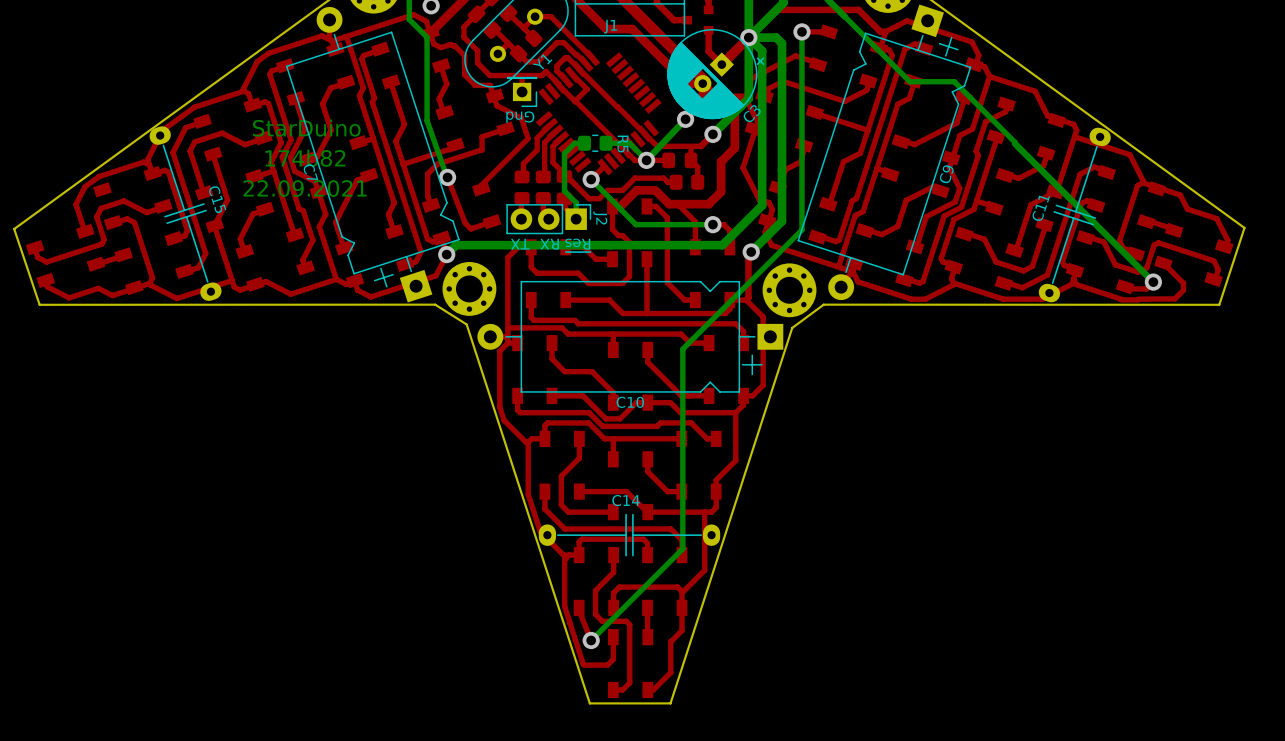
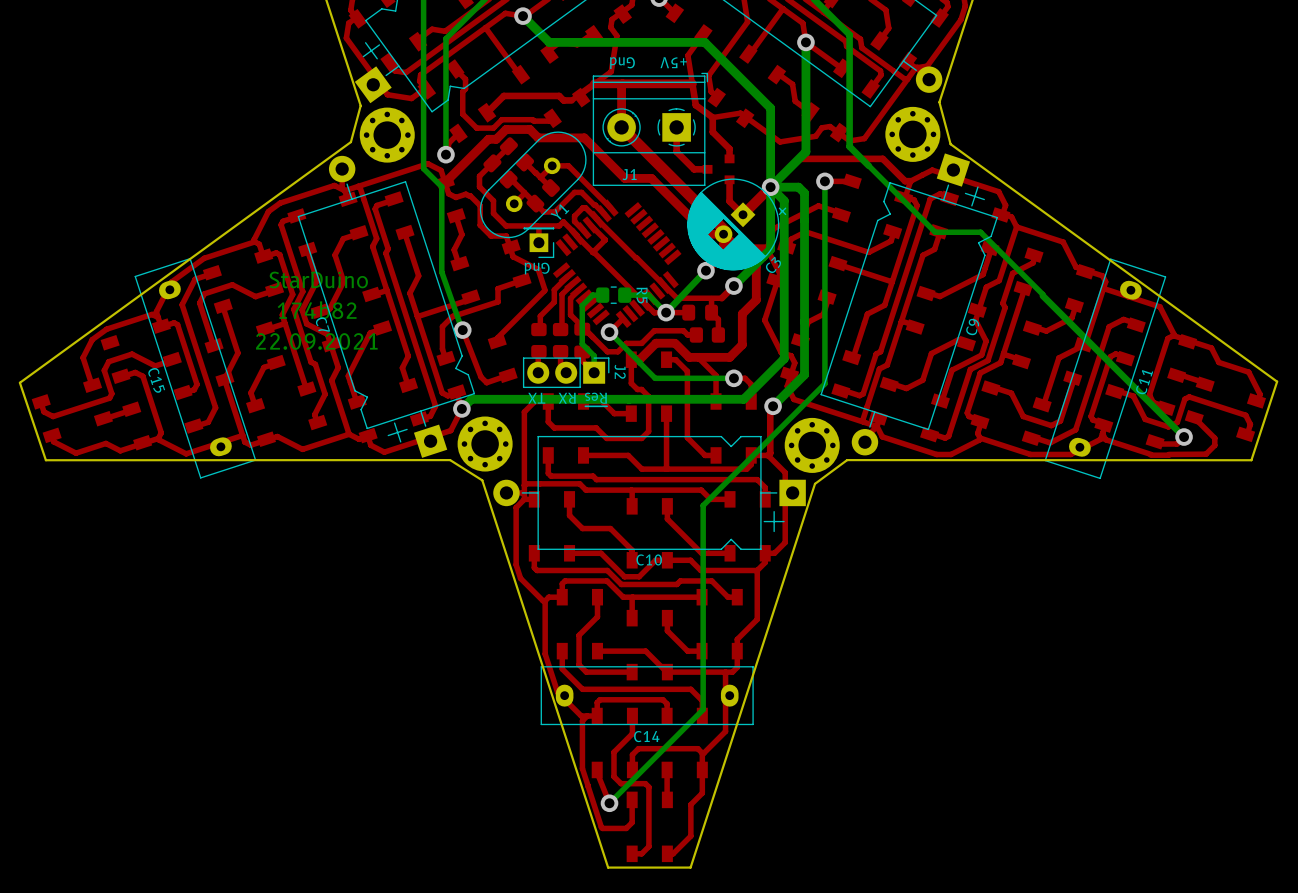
C15 footprint: [149, 126, 222, 301] -> [134, 258, 257, 479]
C11 footprint: [1038, 127, 1111, 303] -> [1044, 258, 1167, 480]
C15 name position: C15 (217, 199) -> C15 (156, 380)
C11 name position: C11 (1041, 208) -> C11 (1144, 382)
C14 name position: C14 (626, 500) -> C14 (646, 736)
C14 footprint: [538, 513, 721, 557] -> [540, 666, 754, 726]

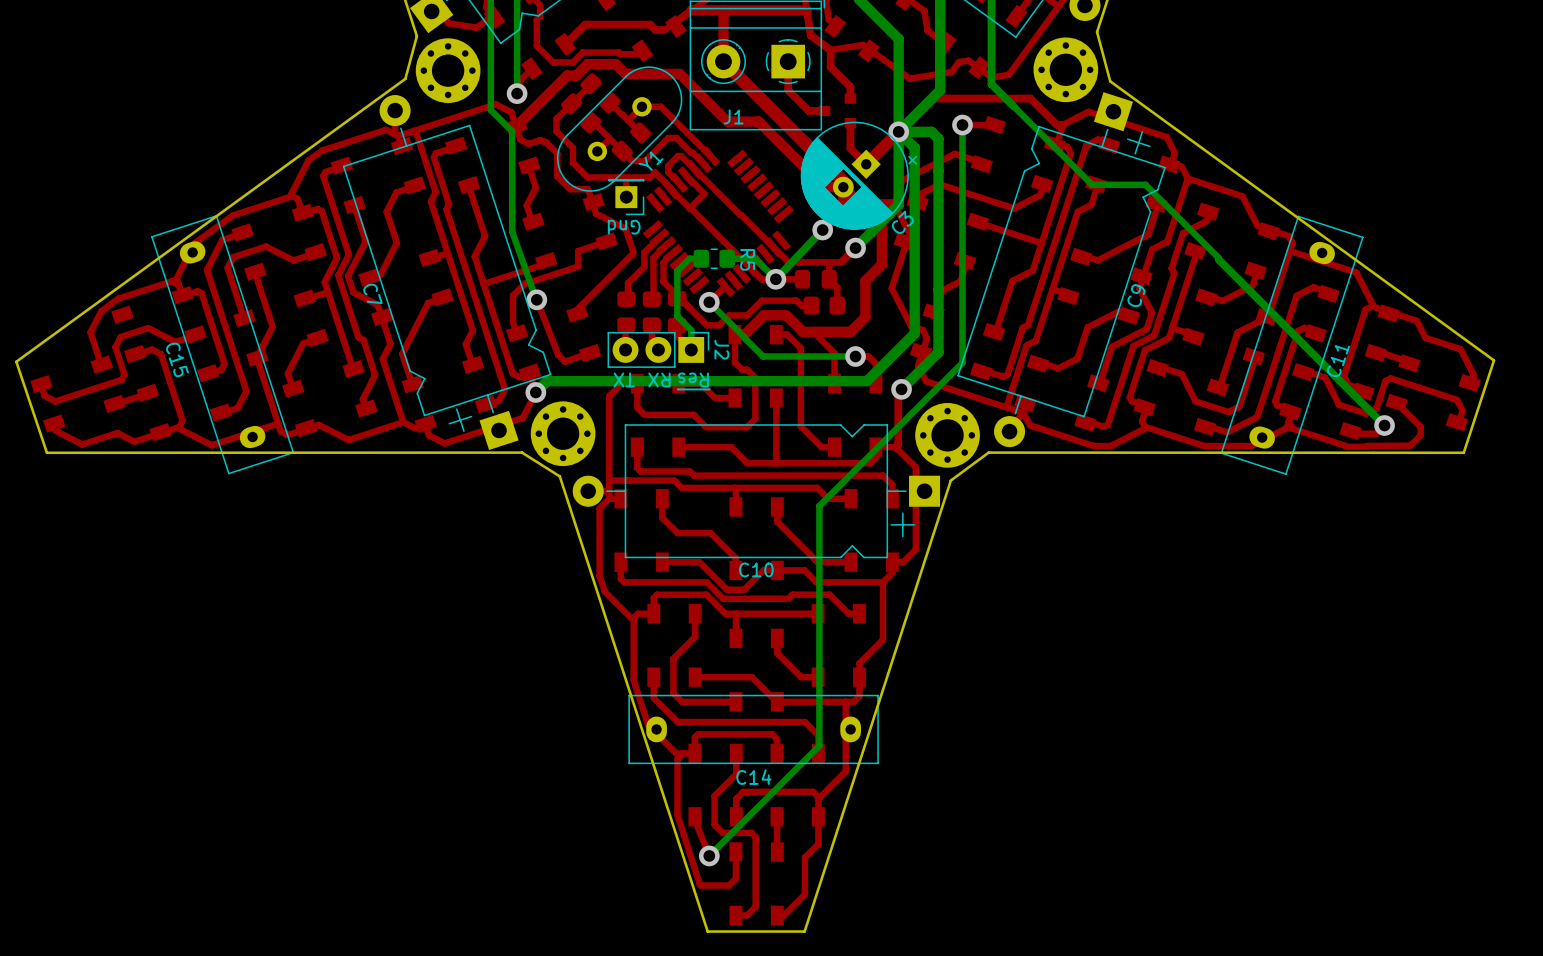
text: StarDuino (318, 279) -> none
text: 174b82 (317, 310) -> none
text: 22.09.2021 (316, 341) -> none

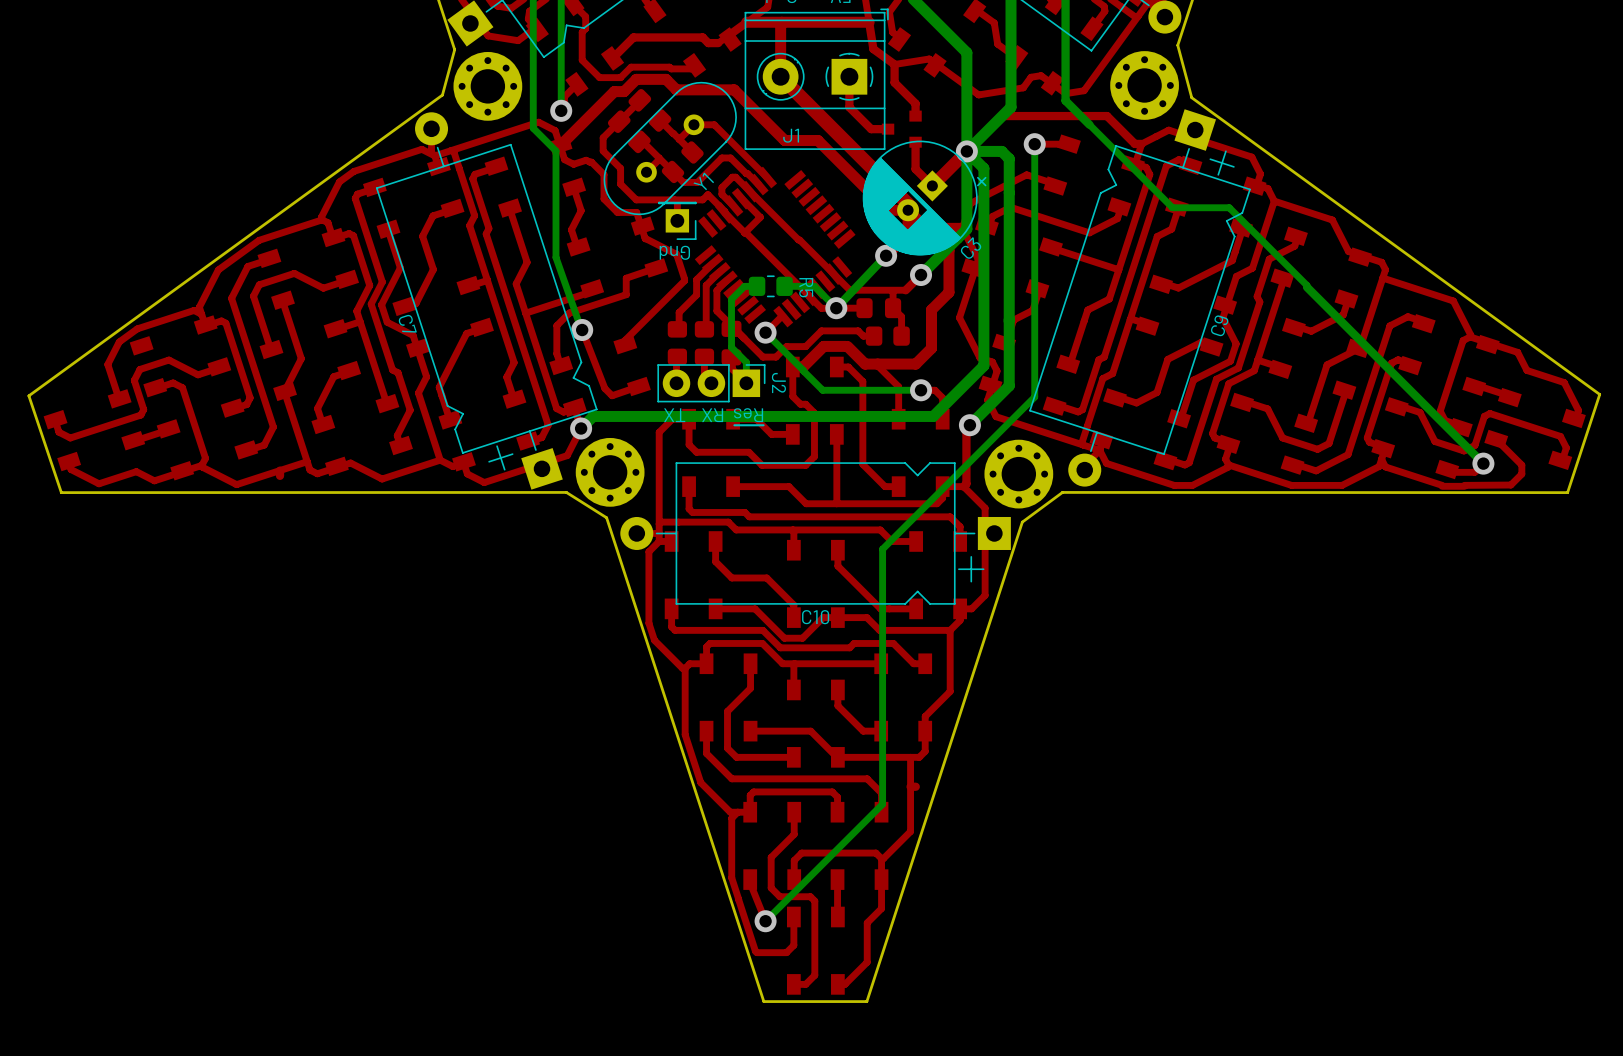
C15: (222, 344) -> none
C11: (1292, 345) -> none
C14: (753, 729) -> none

